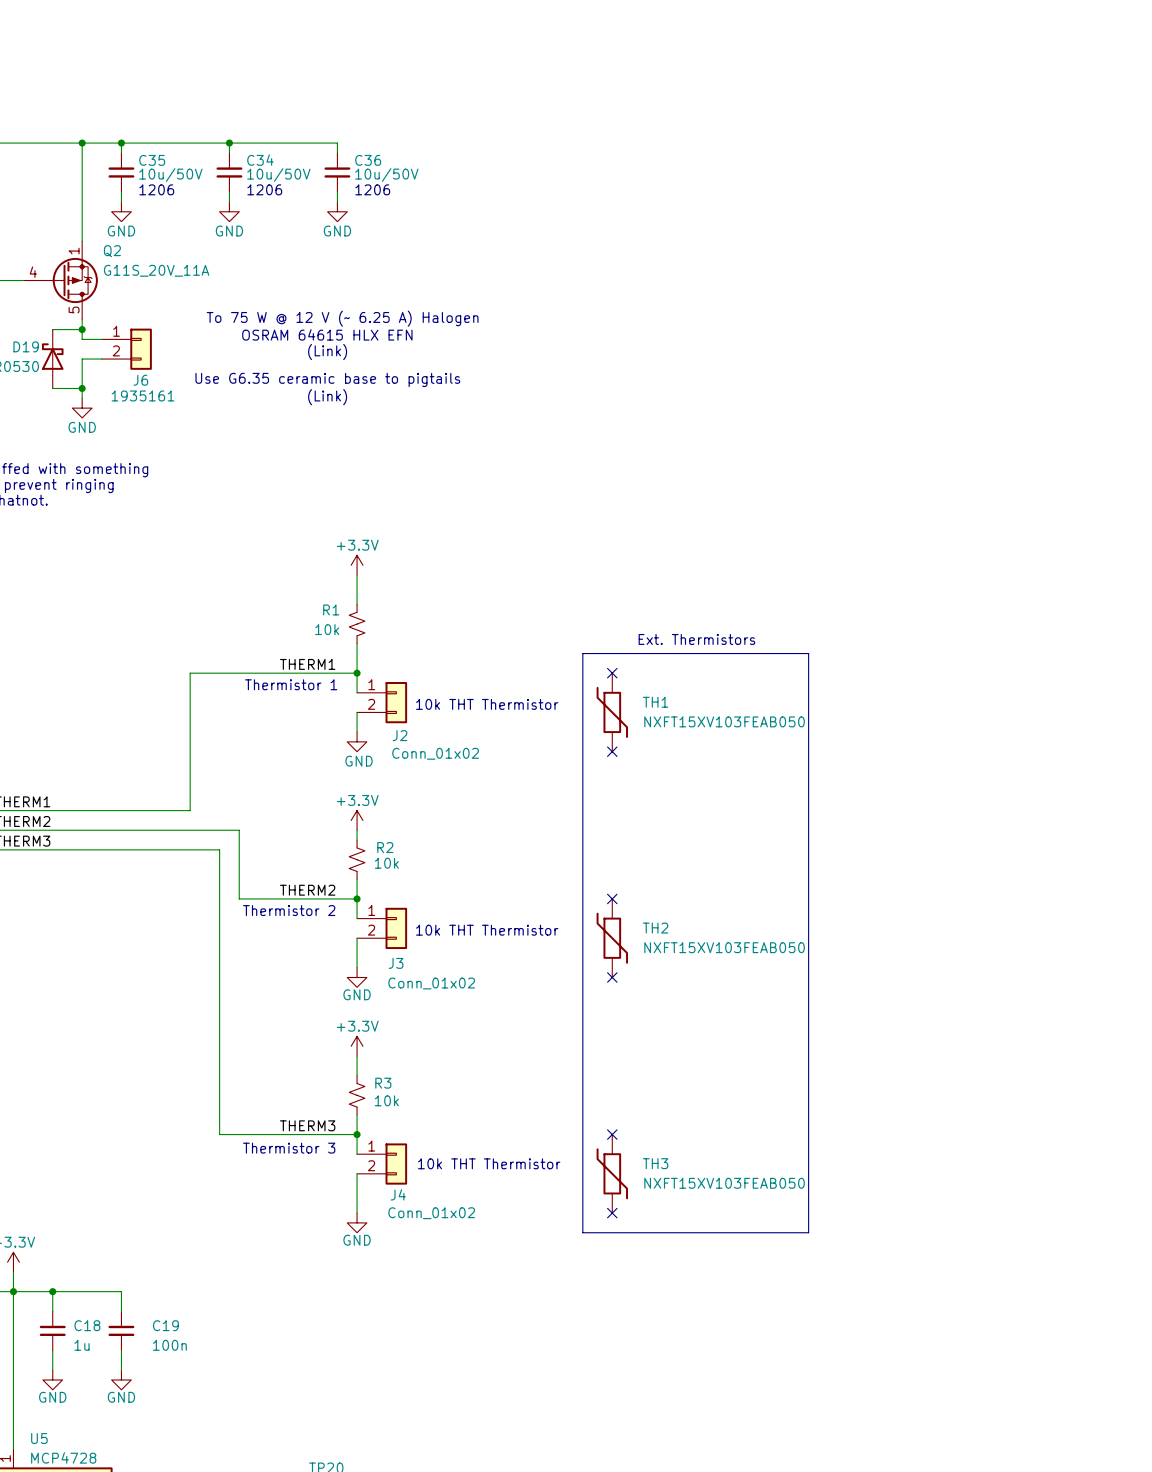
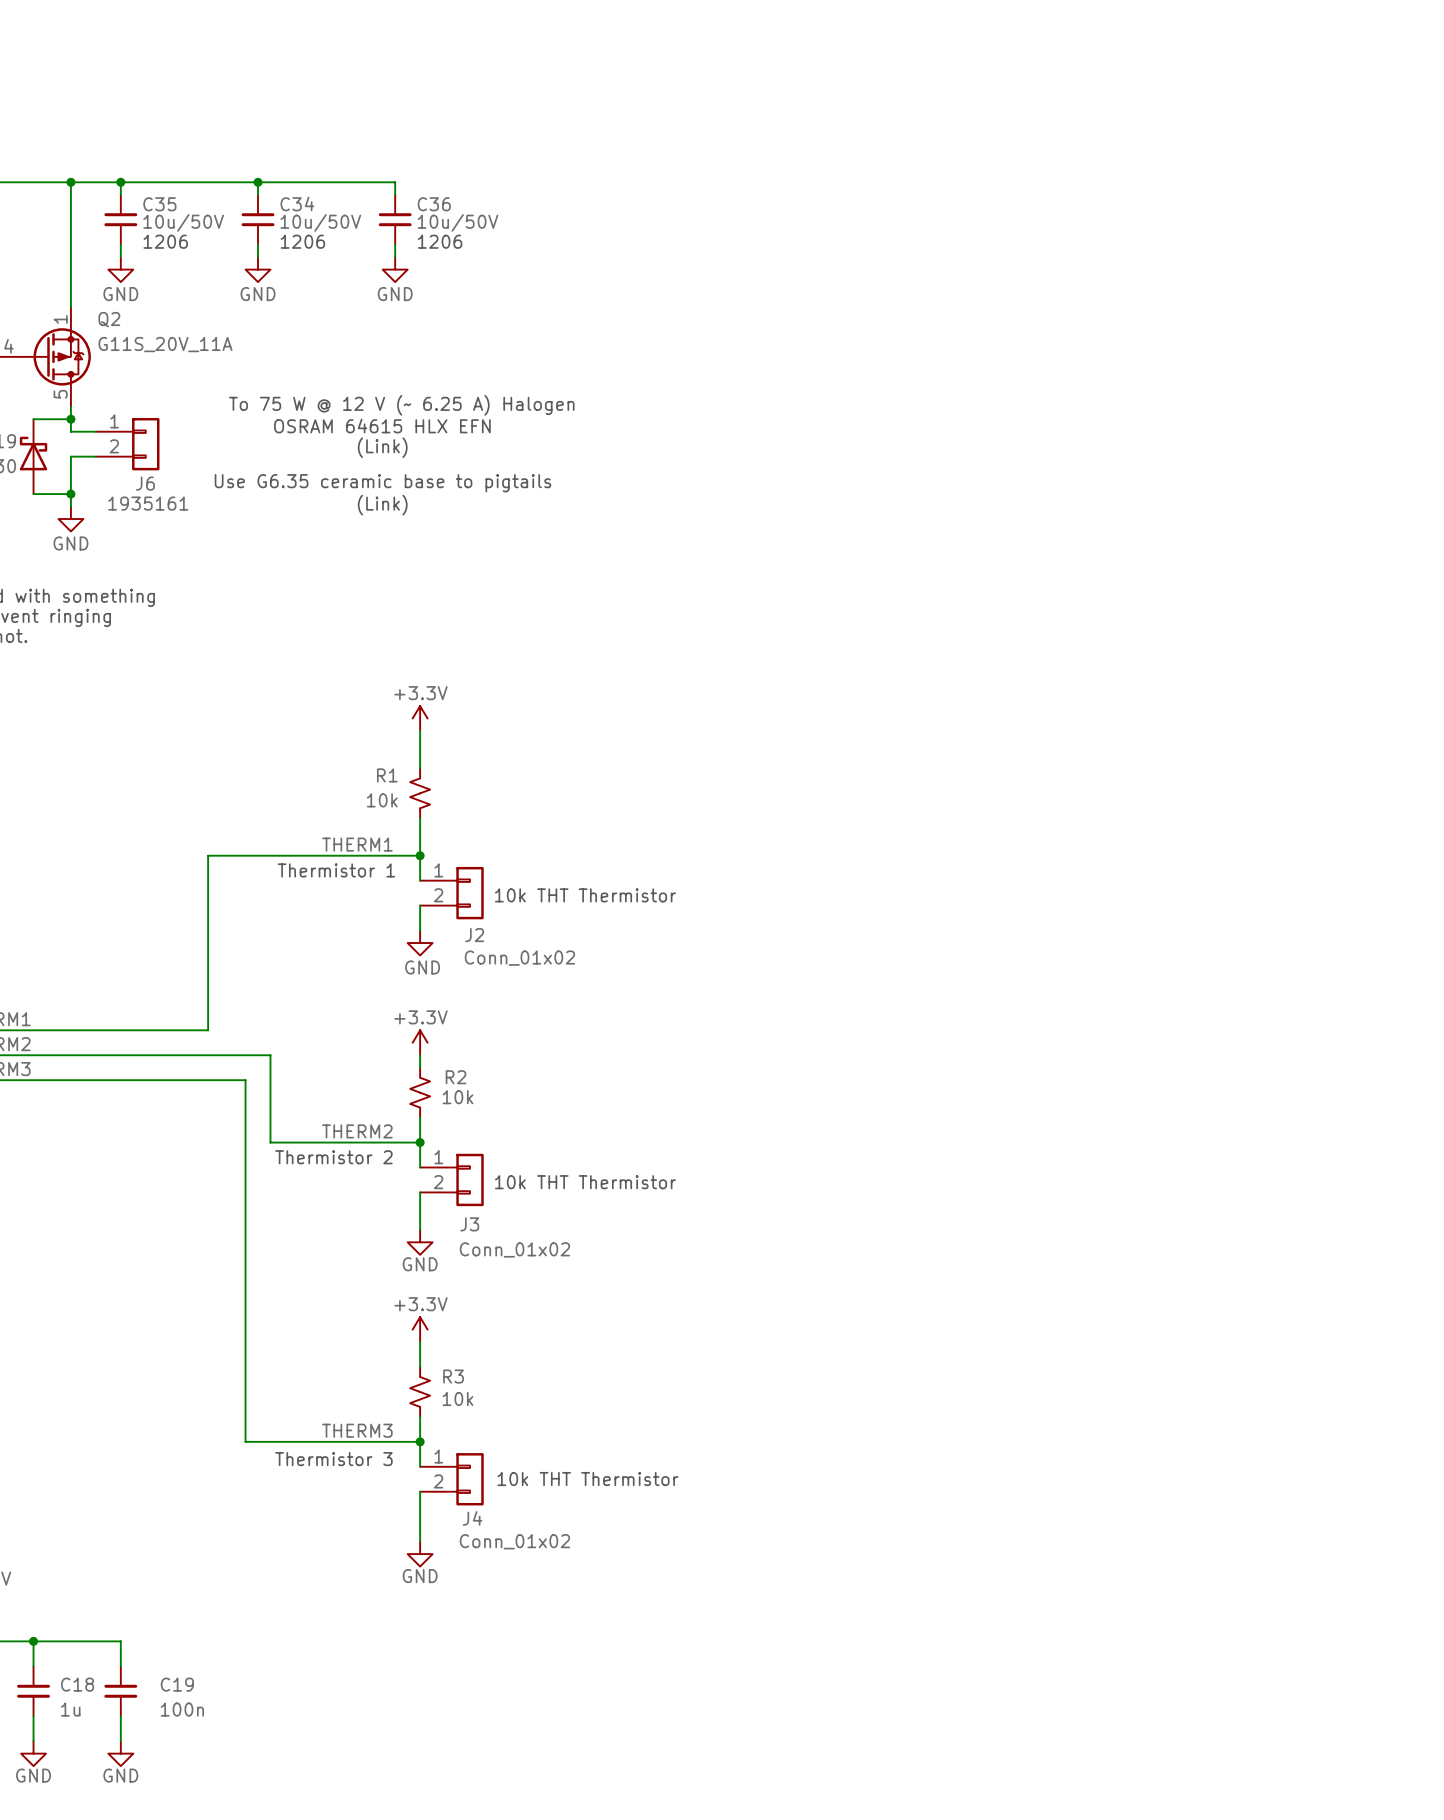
text: Ext. Thermistors (696, 639) -> none
line: (582, 653) (808, 653) (808, 1232) (582, 1232) (582, 653) -> none
no-connect mark: (612, 673) -> none
TH1: NXFT15XV103FEAB050 (612, 712) -> none
no-connect mark: (612, 751) -> none
no-connect mark: (612, 898) -> none
TH2: NXFT15XV103FEAB050 (612, 938) -> none
no-connect mark: (612, 977) -> none
no-connect mark: (612, 1134) -> none
TH3: NXFT15XV103FEAB050 (612, 1173) -> none
no-connect mark: (612, 1213) -> none

